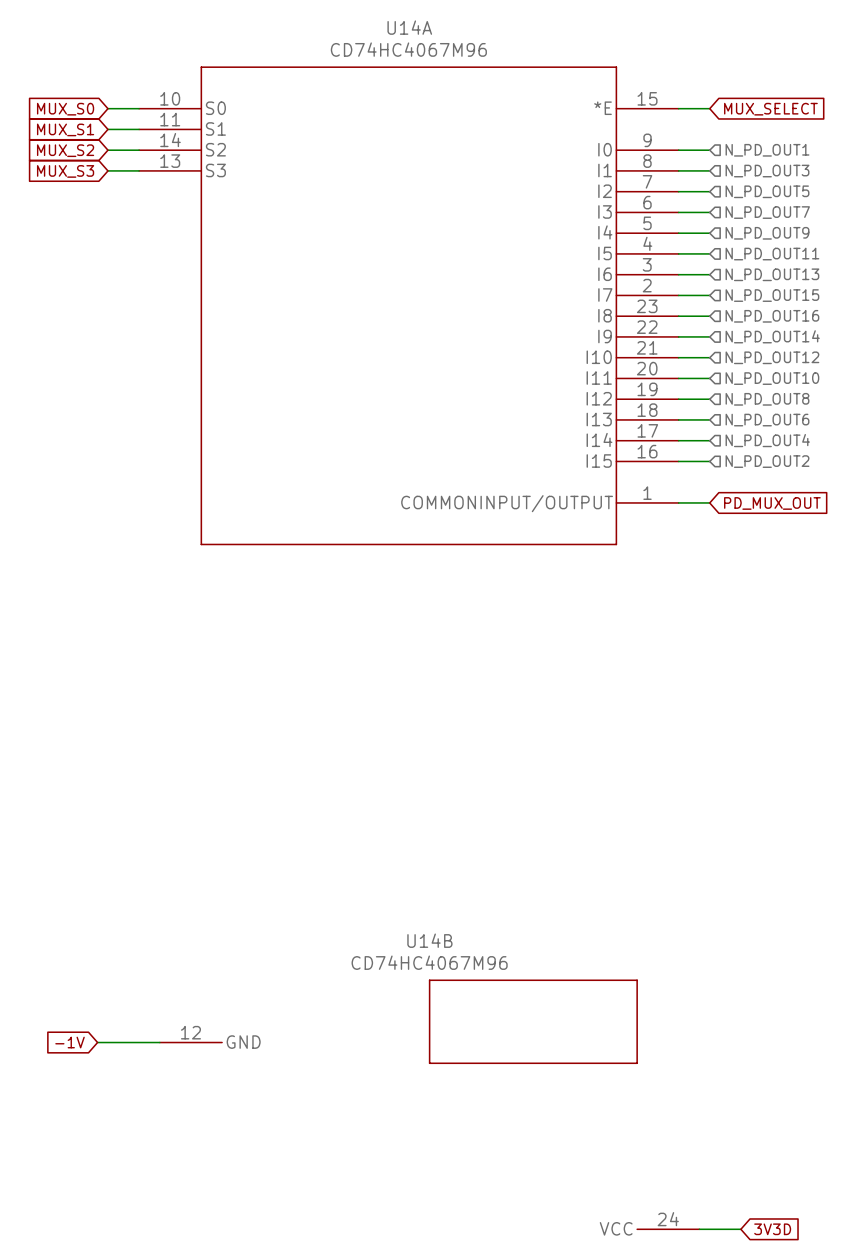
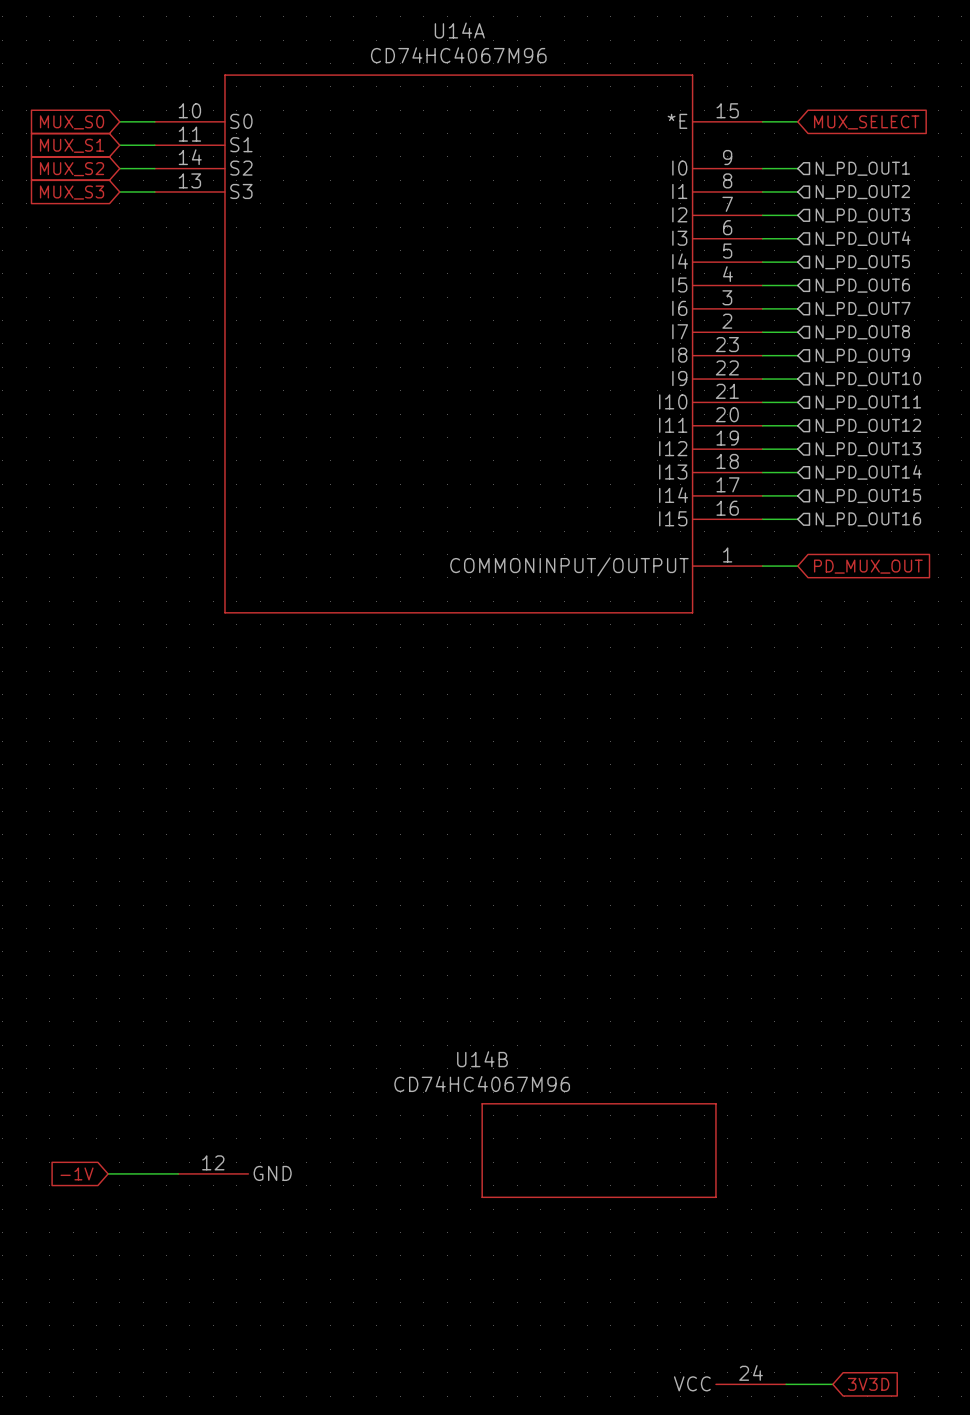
hierarchical label: N_PD_OUT3 (767, 171) -> N_PD_OUT2 (862, 192)
hierarchical label: N_PD_OUT5 (767, 191) -> N_PD_OUT3 (862, 215)
hierarchical label: N_PD_OUT7 (767, 212) -> N_PD_OUT4 (863, 238)
hierarchical label: N_PD_OUT9 (767, 233) -> N_PD_OUT5 (862, 262)
hierarchical label: N_PD_OUT11 (772, 254) -> N_PD_OUT6 (862, 285)
hierarchical label: N_PD_OUT13 (772, 274) -> N_PD_OUT7 (863, 309)
hierarchical label: N_PD_OUT15 (772, 295) -> N_PD_OUT8 (862, 332)
hierarchical label: N_PD_OUT16 (772, 316) -> N_PD_OUT9 (862, 355)
hierarchical label: N_PD_OUT14 (772, 336) -> N_PD_OUT10 (868, 379)
hierarchical label: N_PD_OUT12 (772, 357) -> N_PD_OUT11 (868, 402)
hierarchical label: N_PD_OUT10 (772, 378) -> N_PD_OUT12 (868, 425)
hierarchical label: N_PD_OUT8 (767, 399) -> N_PD_OUT13 (868, 449)
hierarchical label: N_PD_OUT6 (767, 420) -> N_PD_OUT14 (868, 472)
hierarchical label: N_PD_OUT4 (767, 440) -> N_PD_OUT15 (868, 496)
hierarchical label: N_PD_OUT2 (767, 461) -> N_PD_OUT16 (868, 519)

